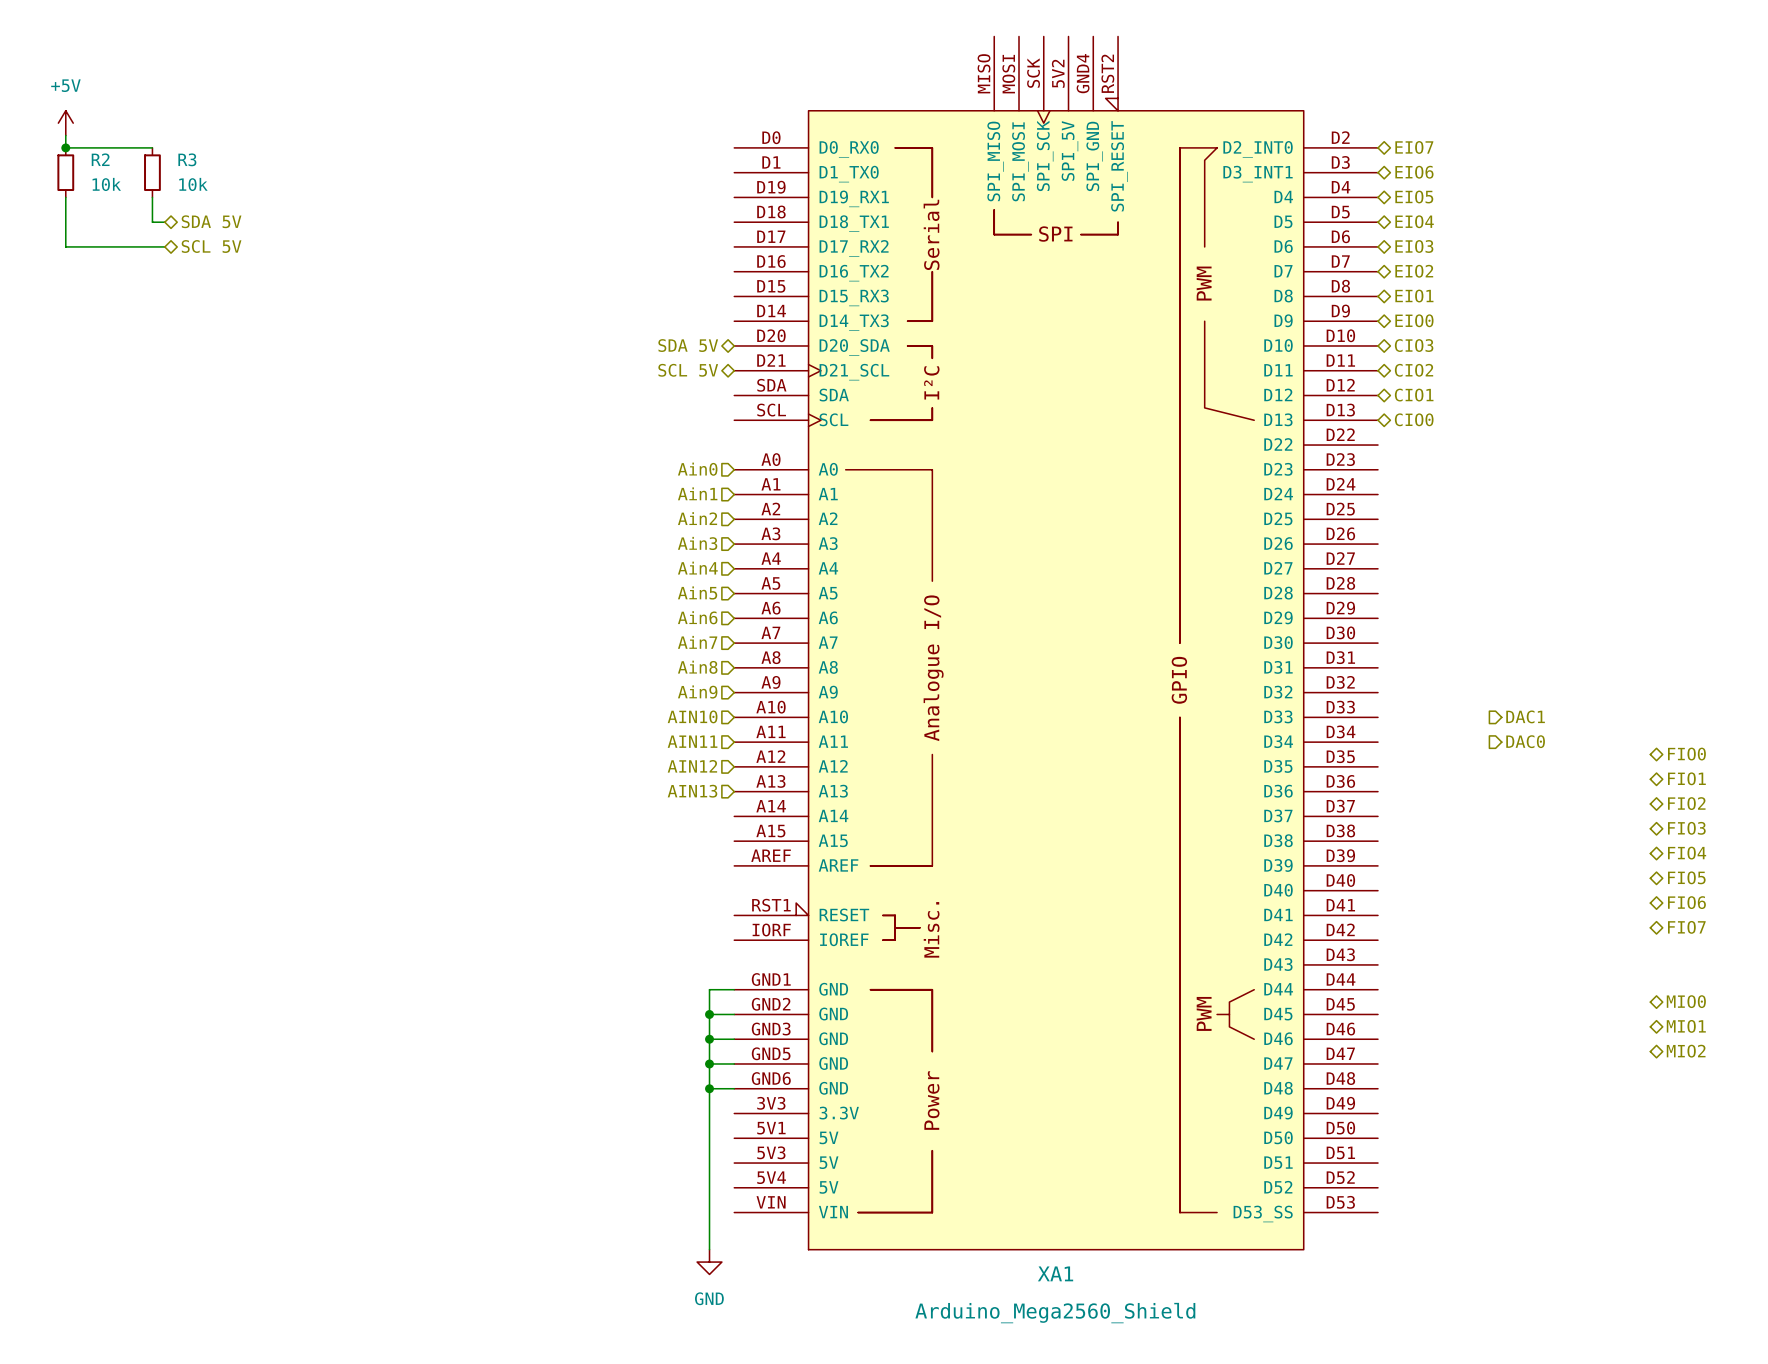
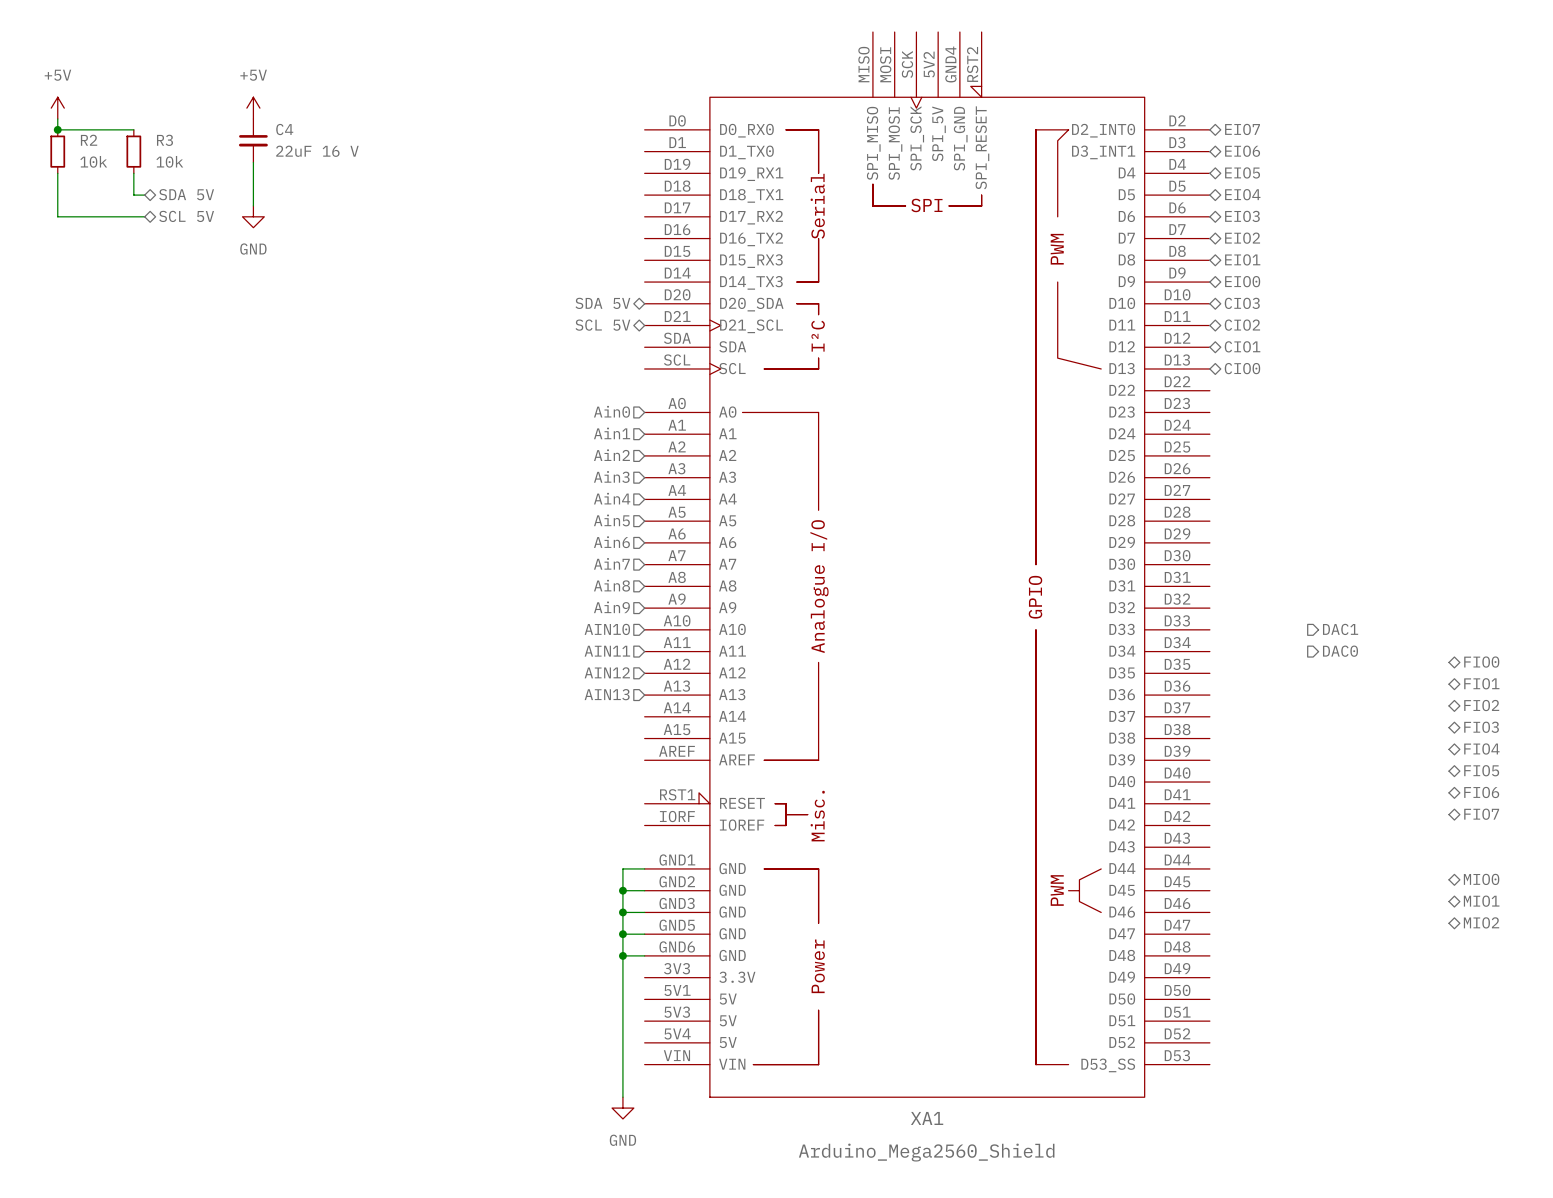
power symbol: none -> +5V (253, 108)
C4: none -> 22uF 16 V (253, 140)
wire: none -> (253, 162) (253, 205)
power symbol: none -> GND (253, 216)

